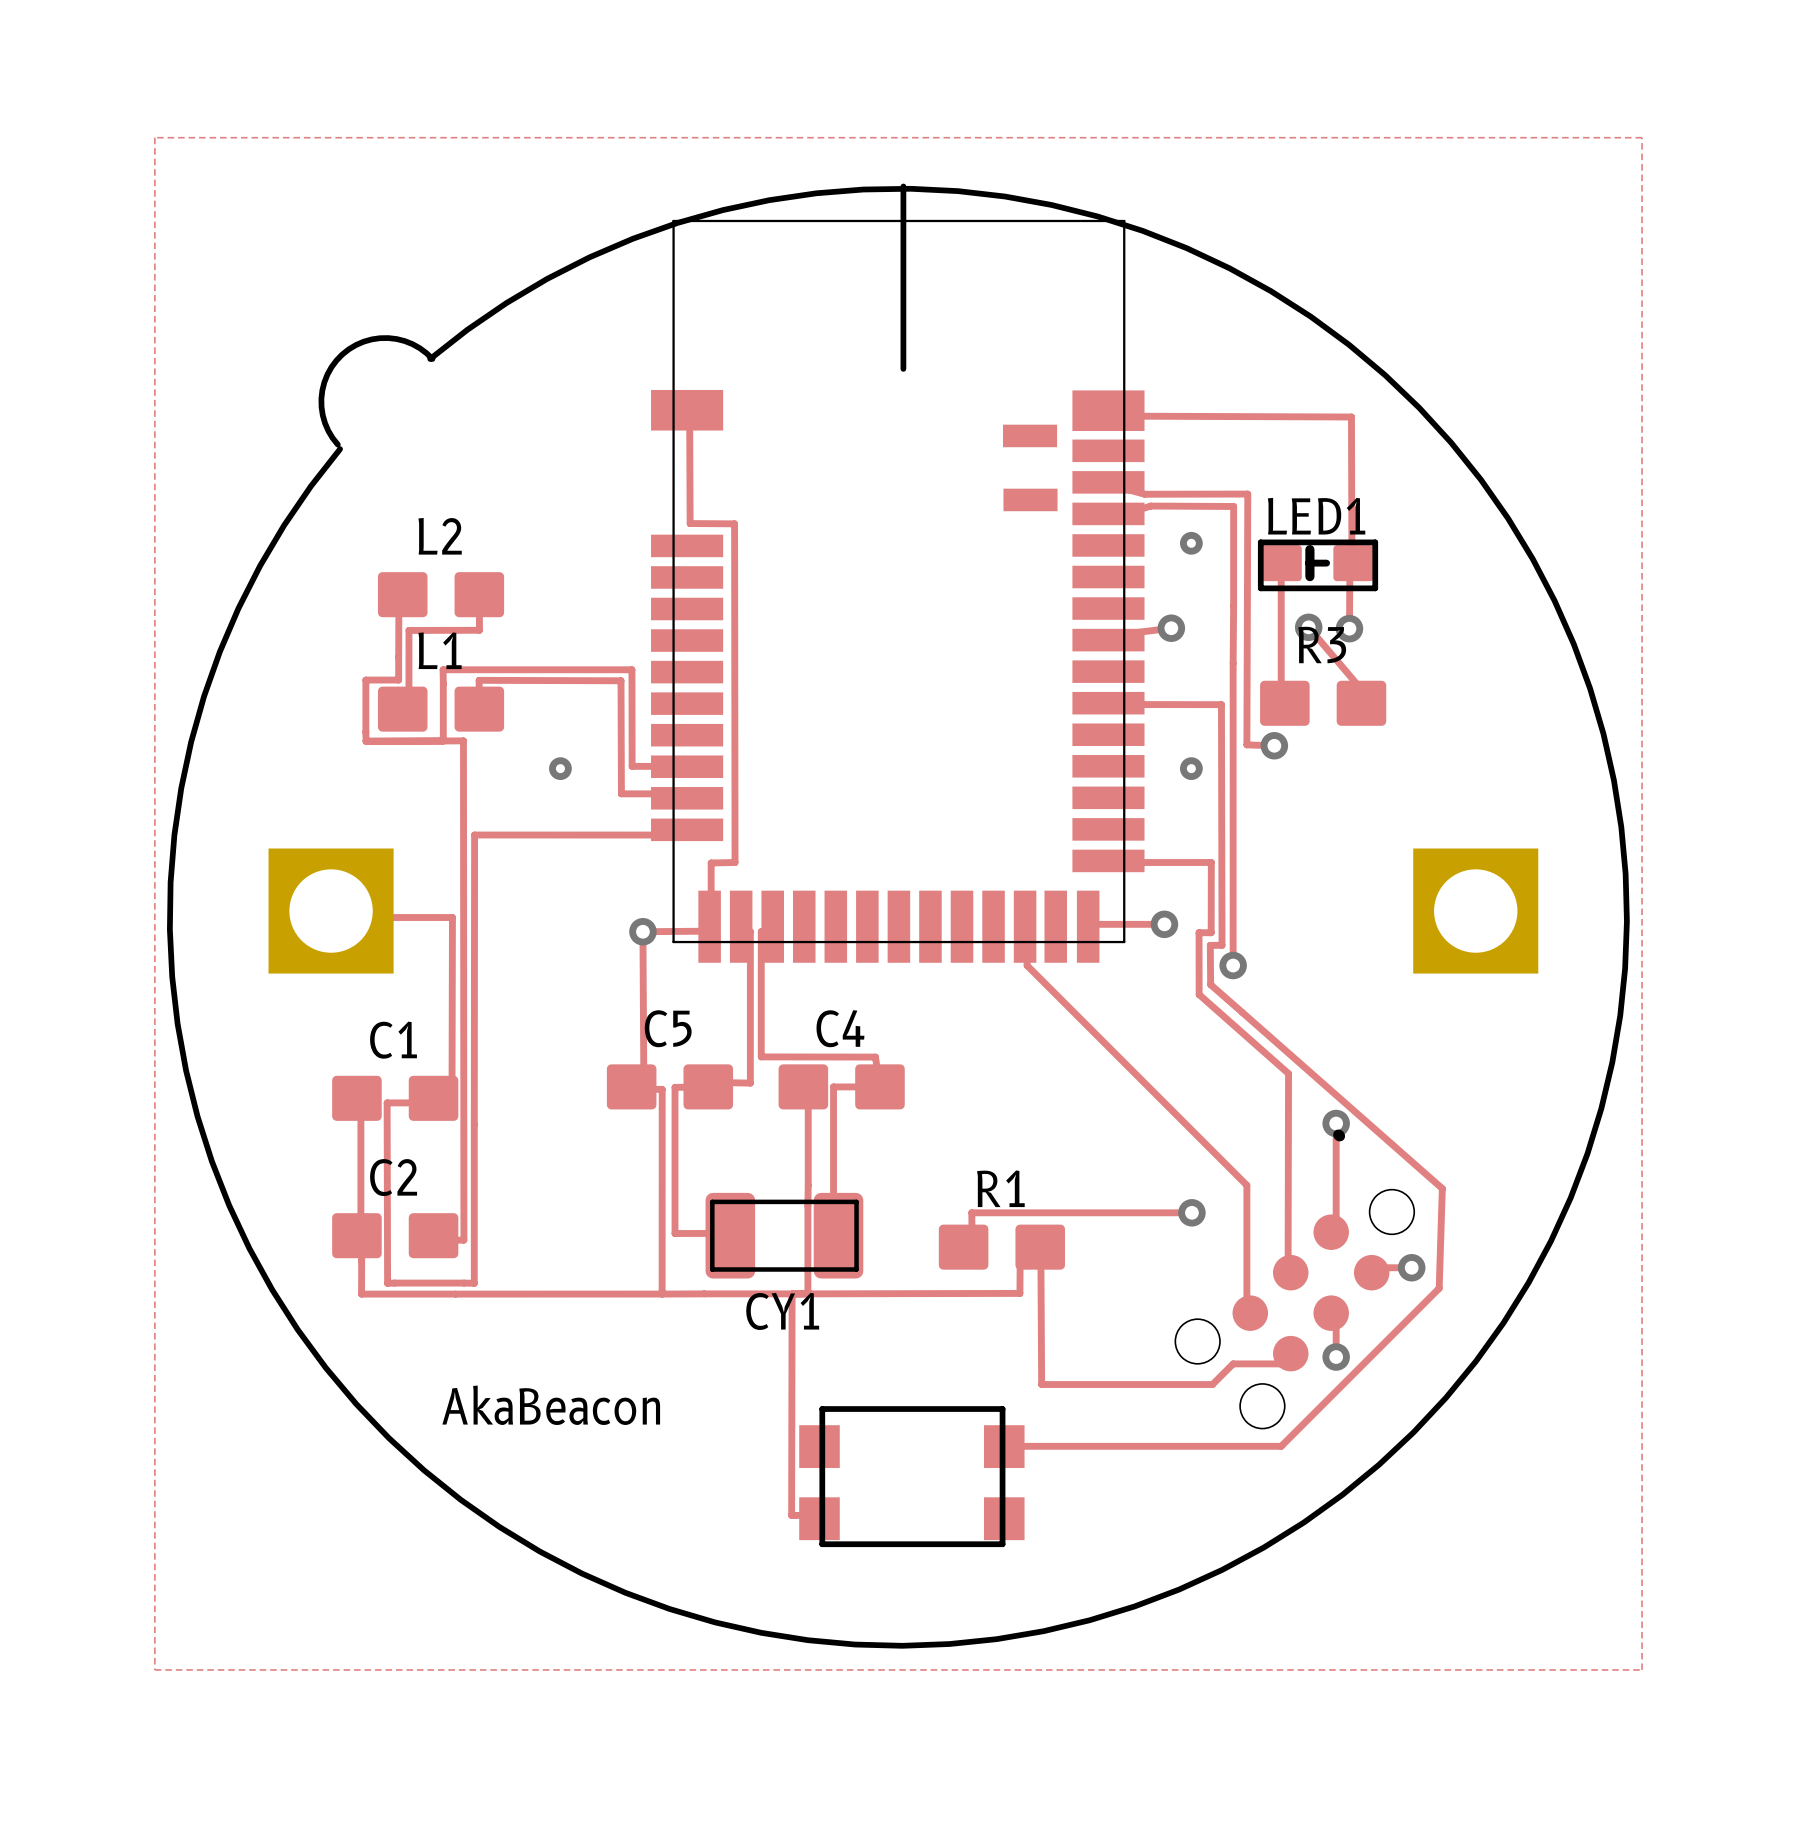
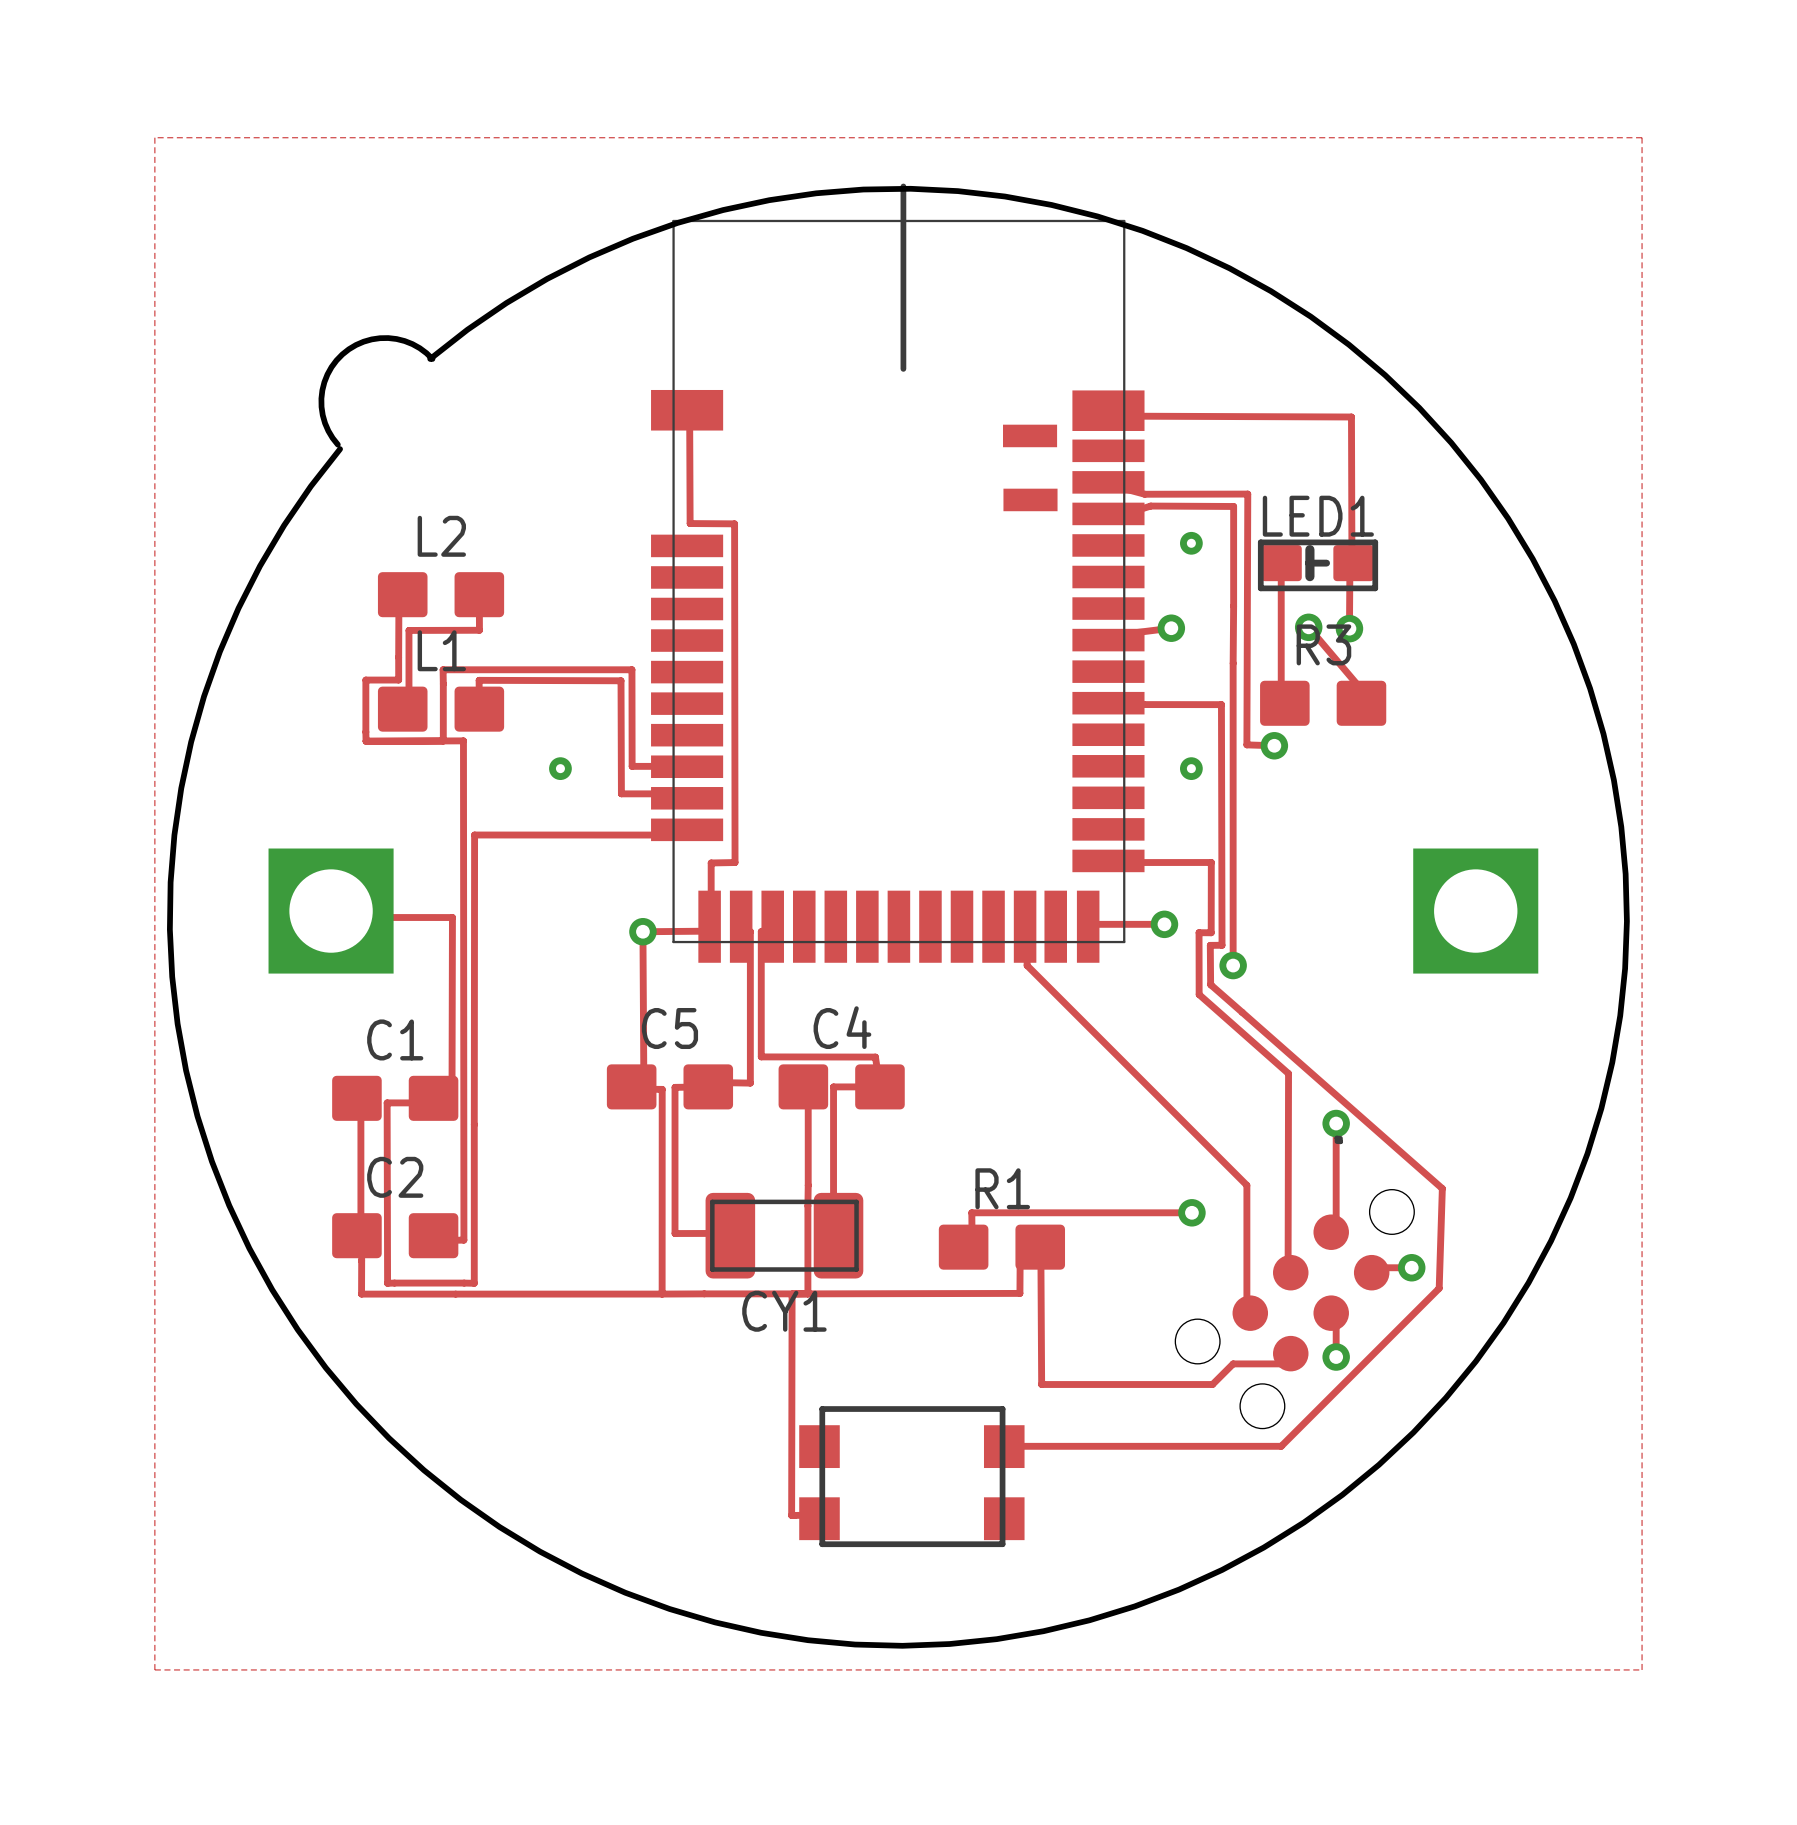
text: AkaBeacon (551, 1405) -> none

